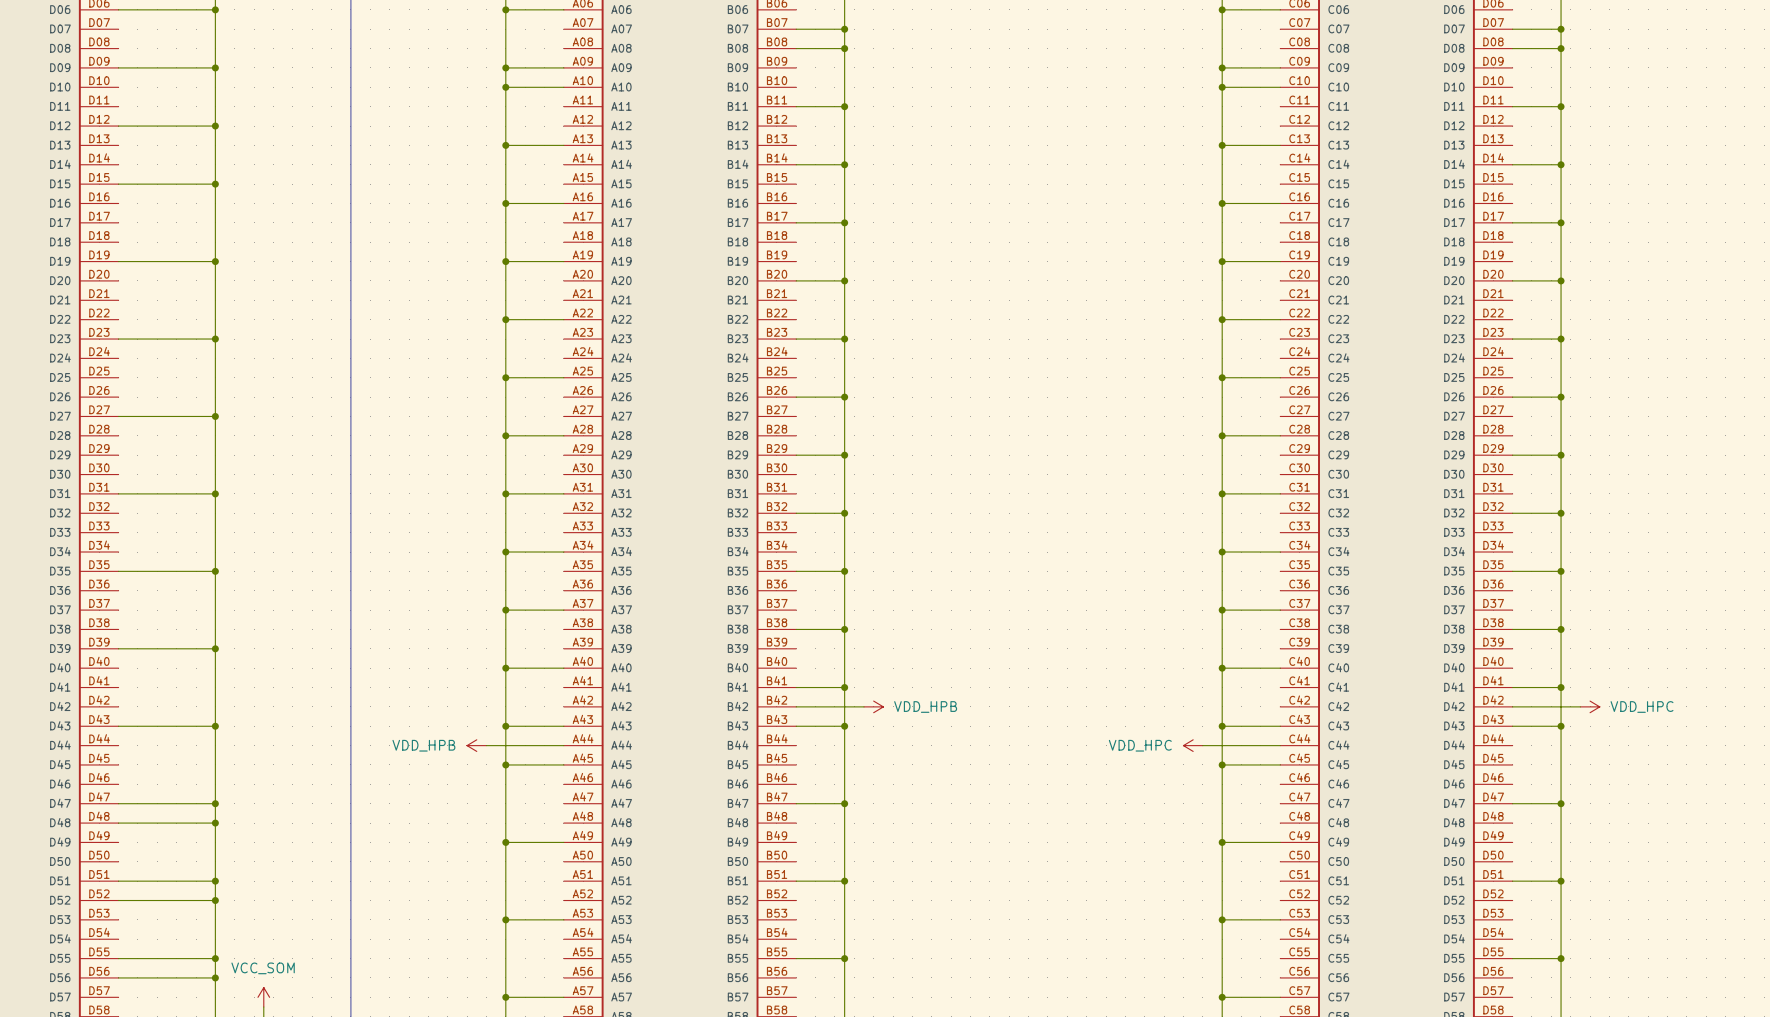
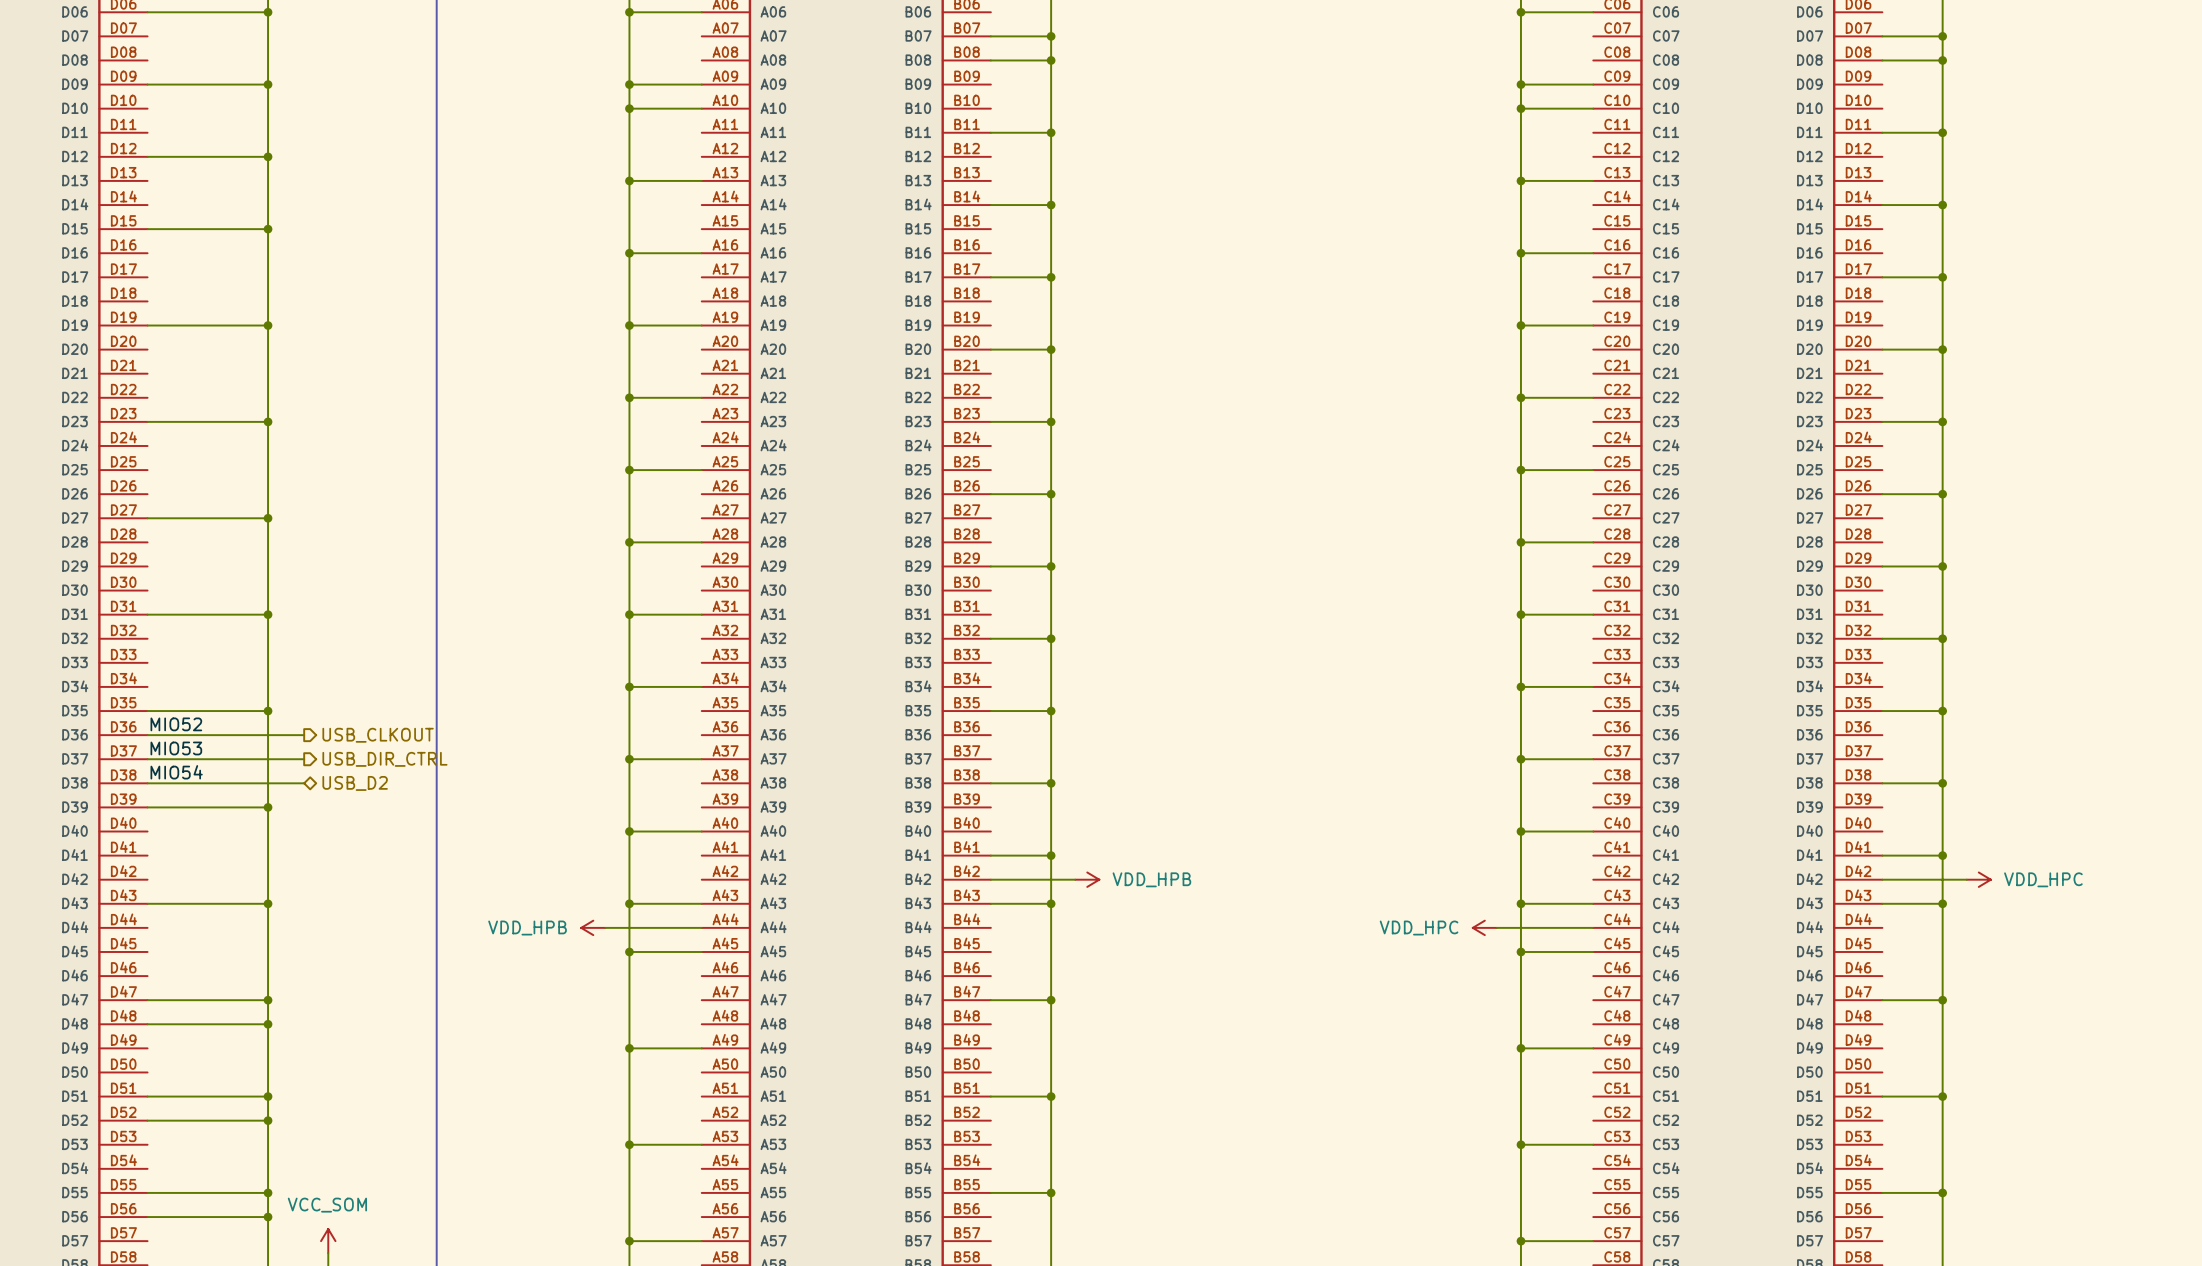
label: none -> MIO52 (176, 724)
wire: none -> (147, 735) (304, 735)
hierarchical label: none -> USB_CLKOUT (378, 735)
label: none -> MIO53 (176, 748)
wire: none -> (147, 759) (304, 759)
hierarchical label: none -> USB_DIR_CTRL (384, 759)
label: none -> MIO54 (176, 772)
wire: none -> (147, 783) (304, 783)
hierarchical label: none -> USB_D2 (355, 783)

